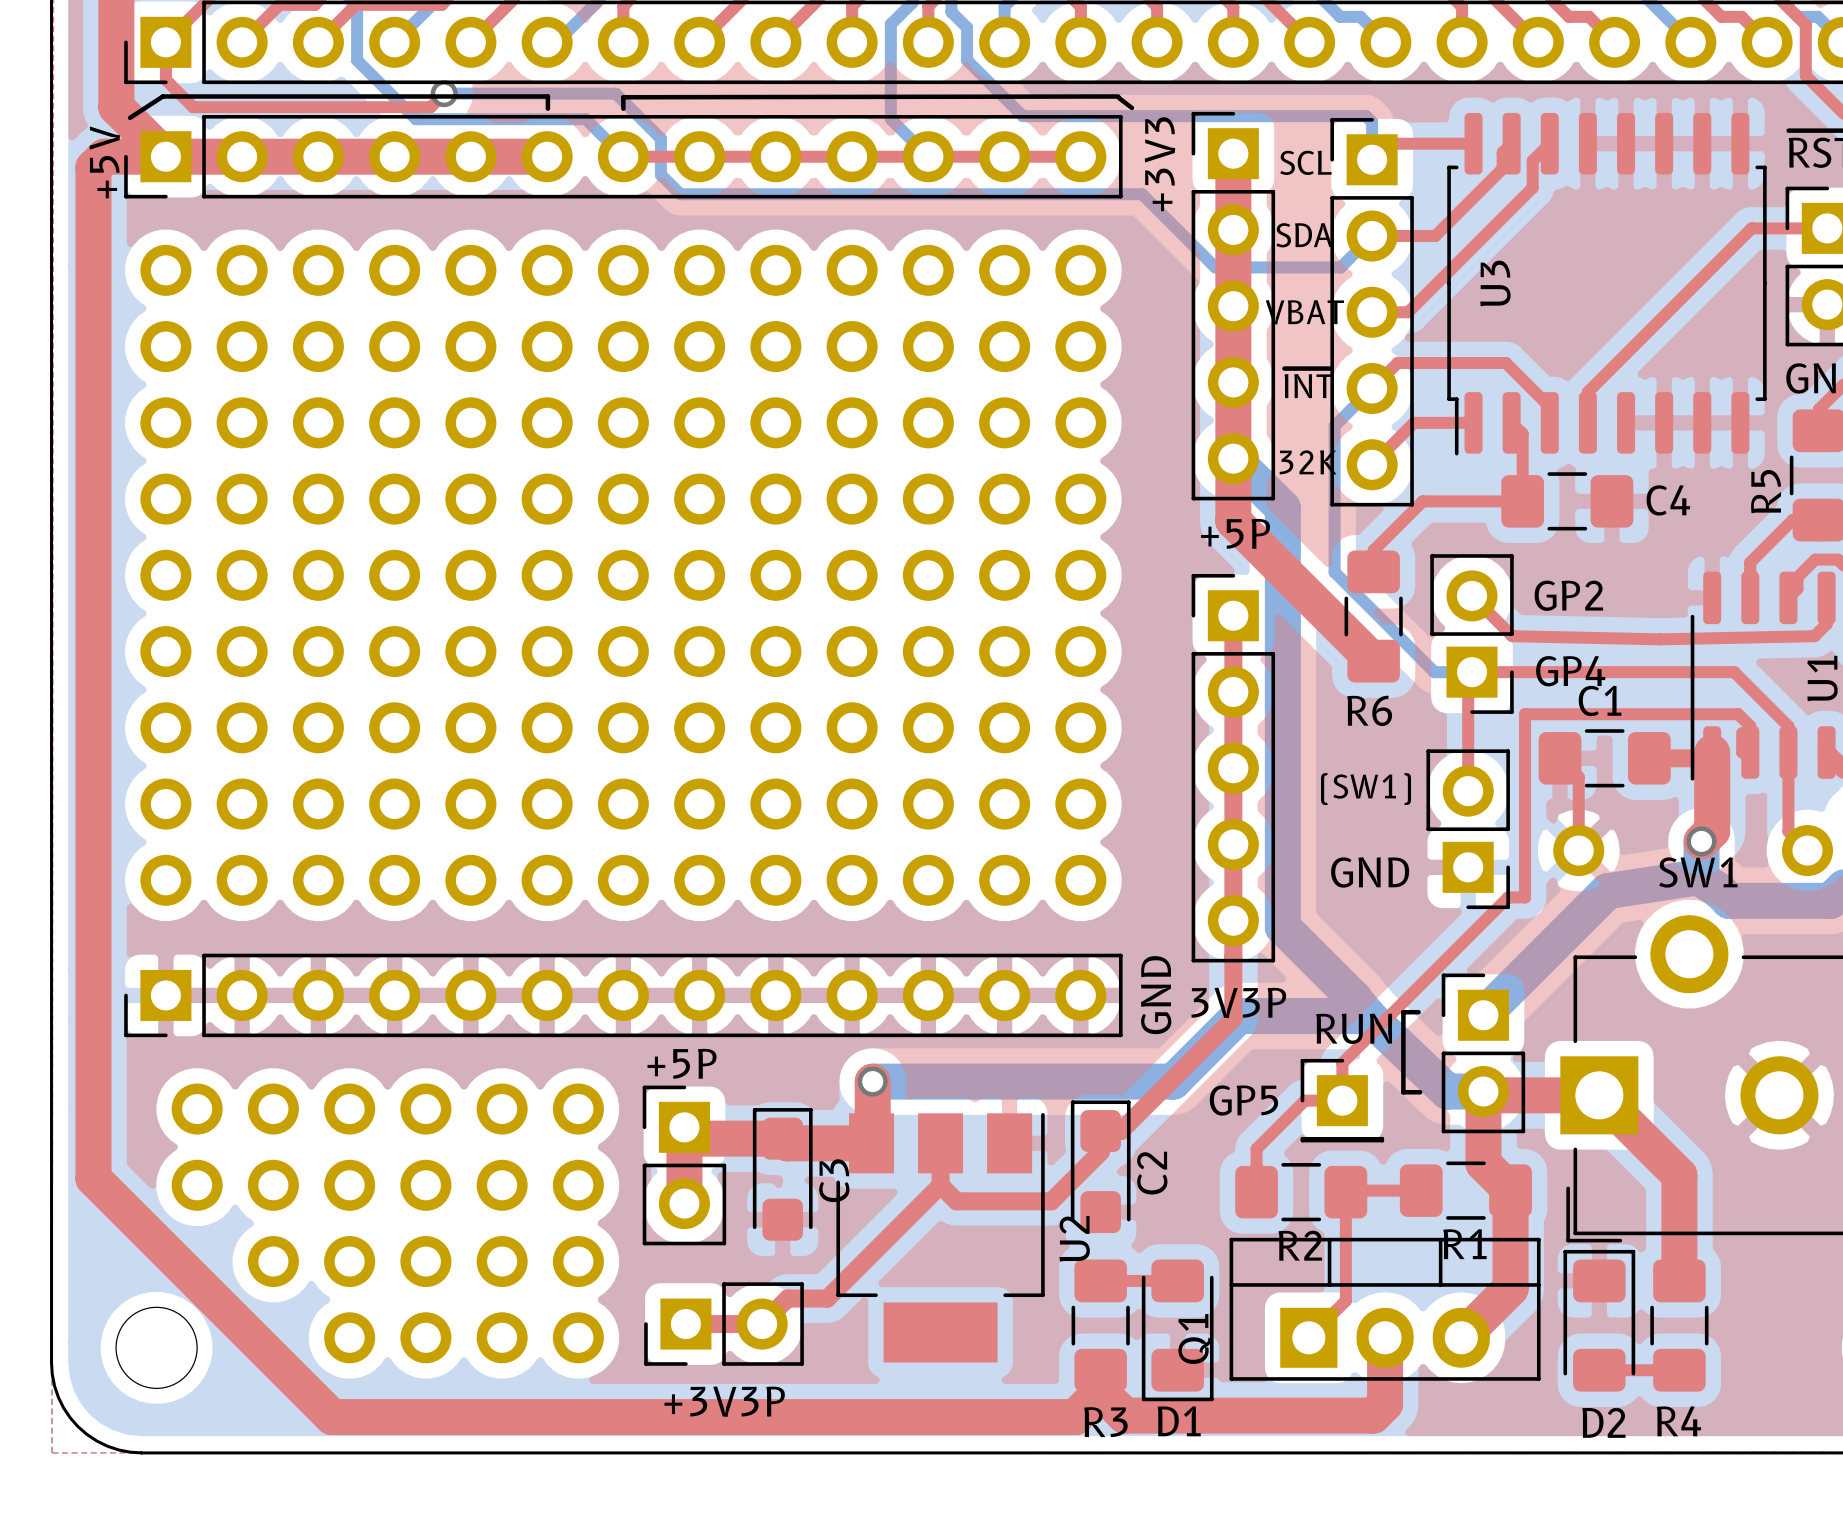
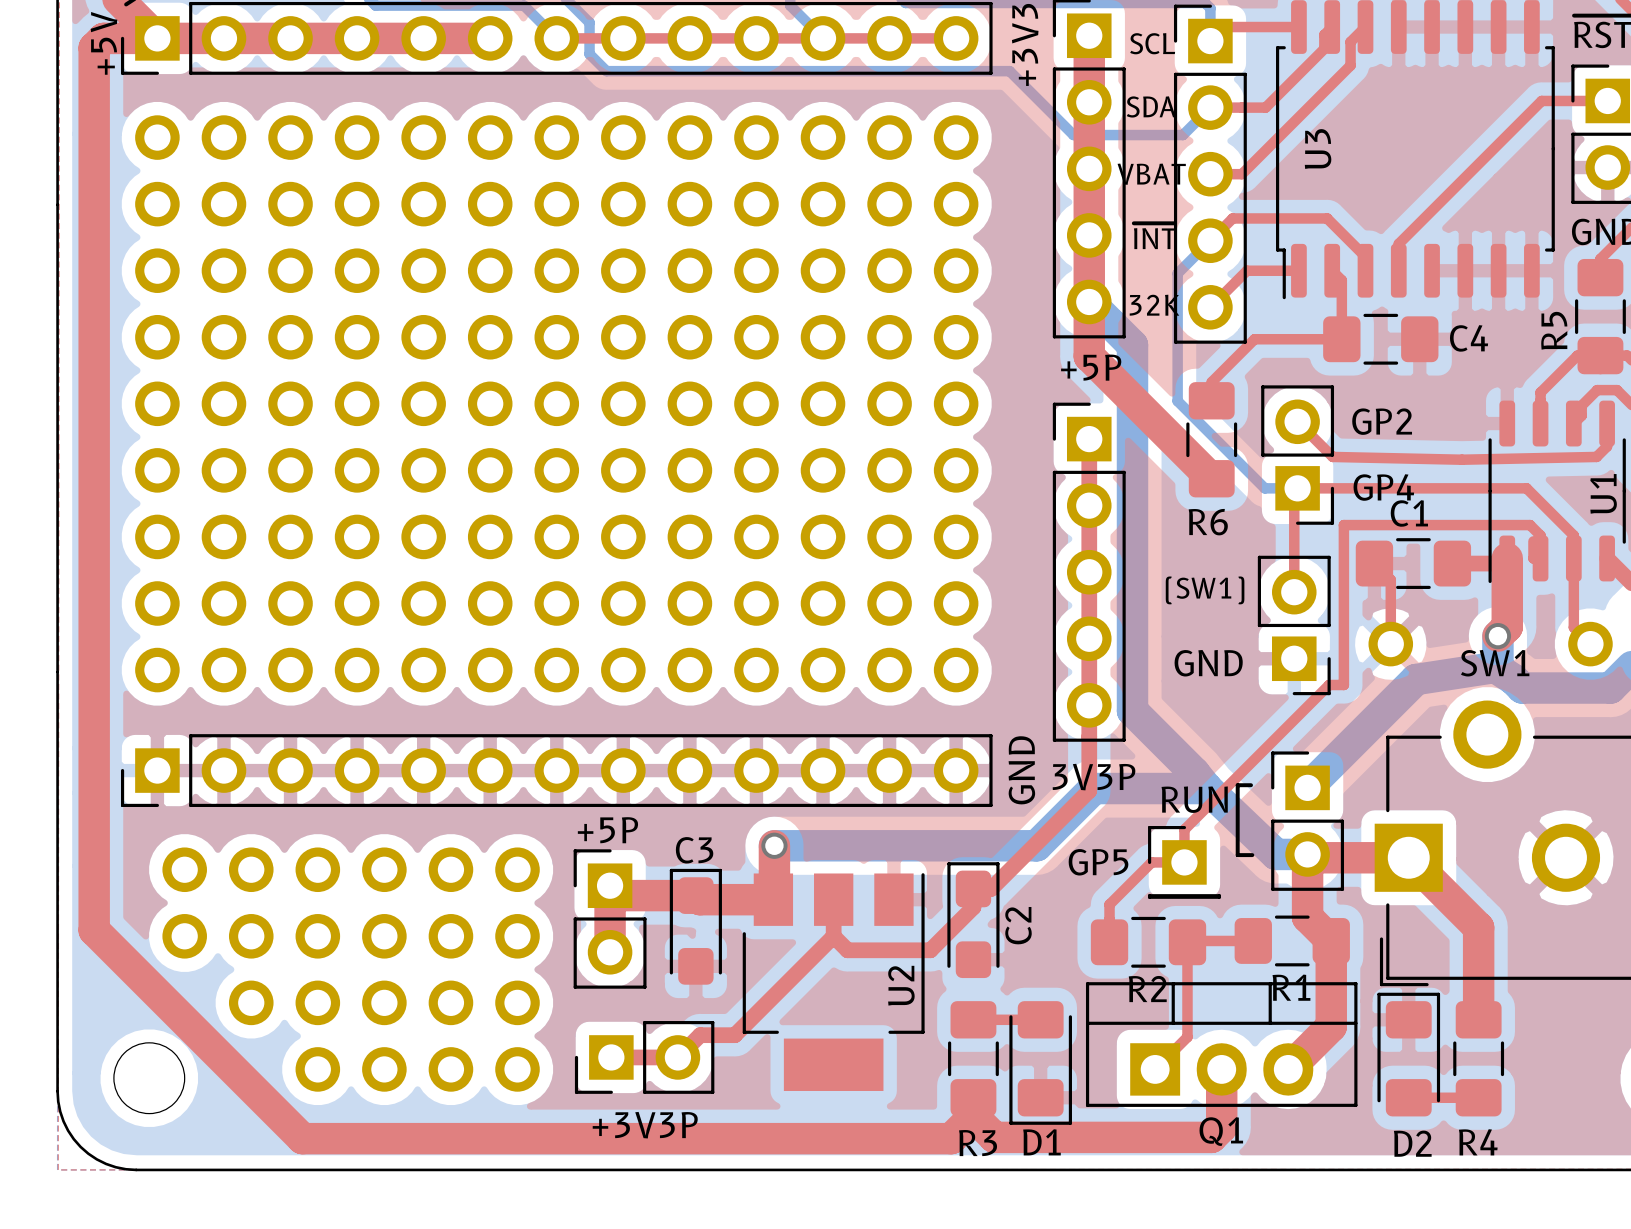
C3 name rotation: 0° (834, 1180) -> 90° clockwise (694, 850)
C3 name position: C3 (834, 1180) -> C3 (694, 850)
U2 name position: U2 (1074, 1238) -> U2 (901, 985)
Q1 name rotation: 0° (1194, 1339) -> 90° clockwise (1221, 1131)
Q1 name position: Q1 (1194, 1339) -> Q1 (1221, 1131)

